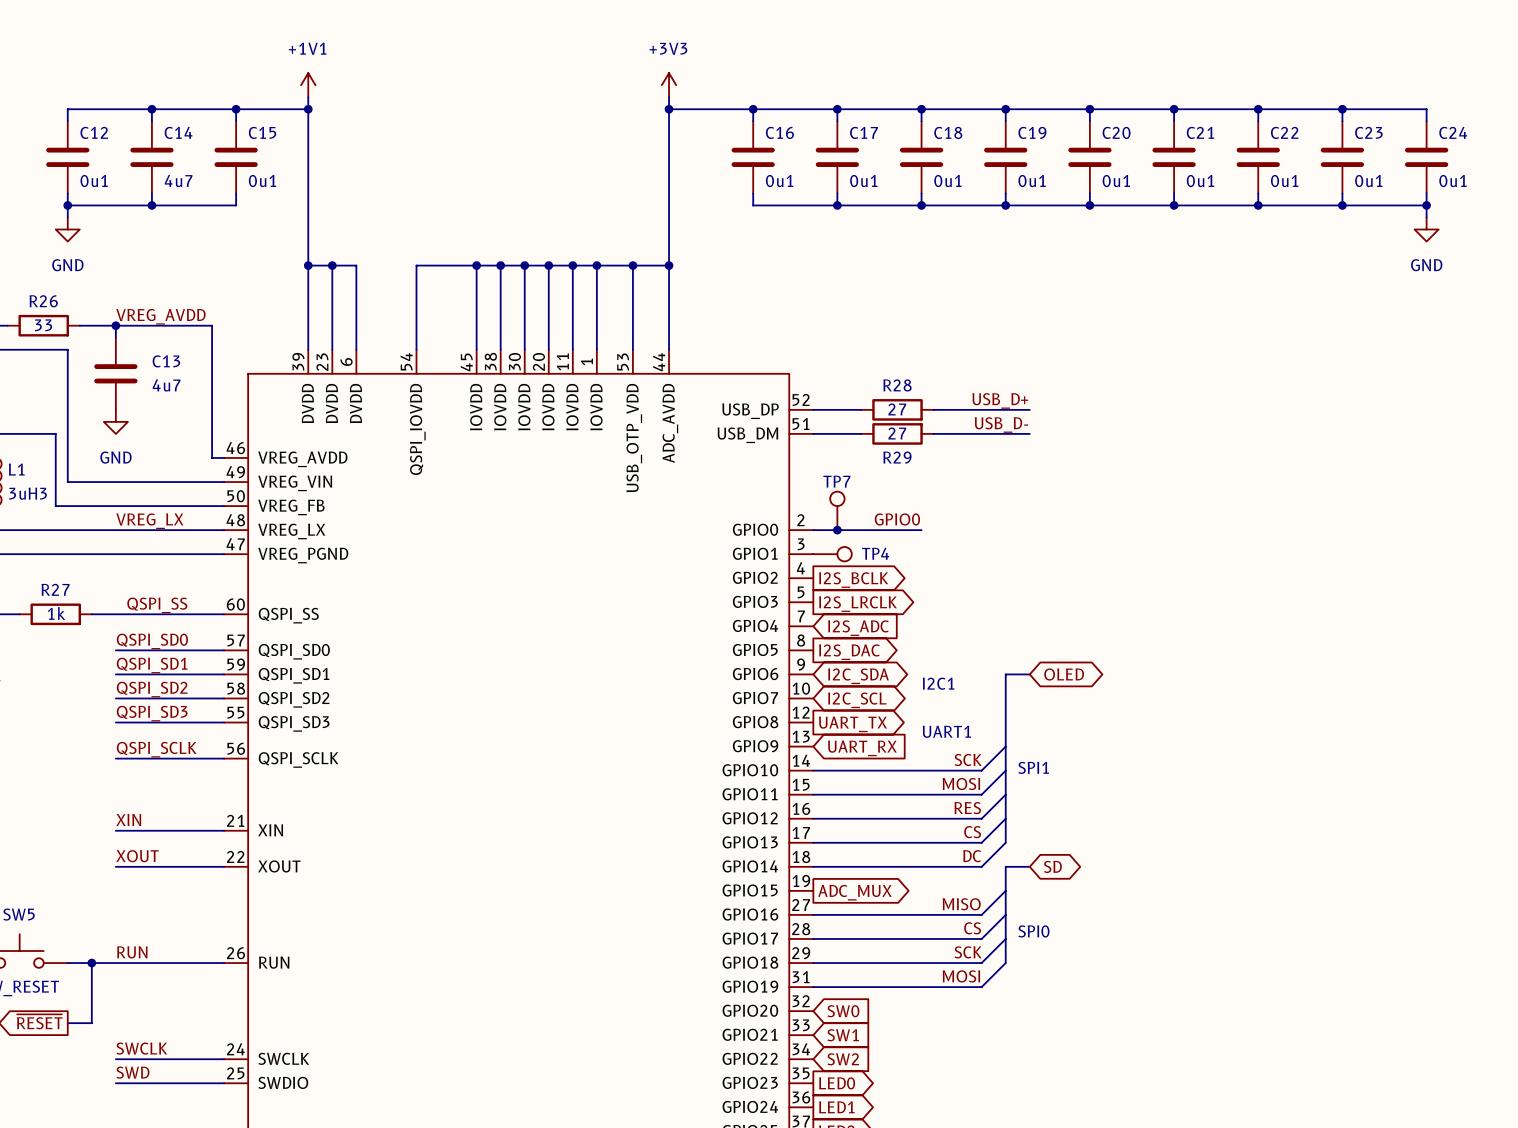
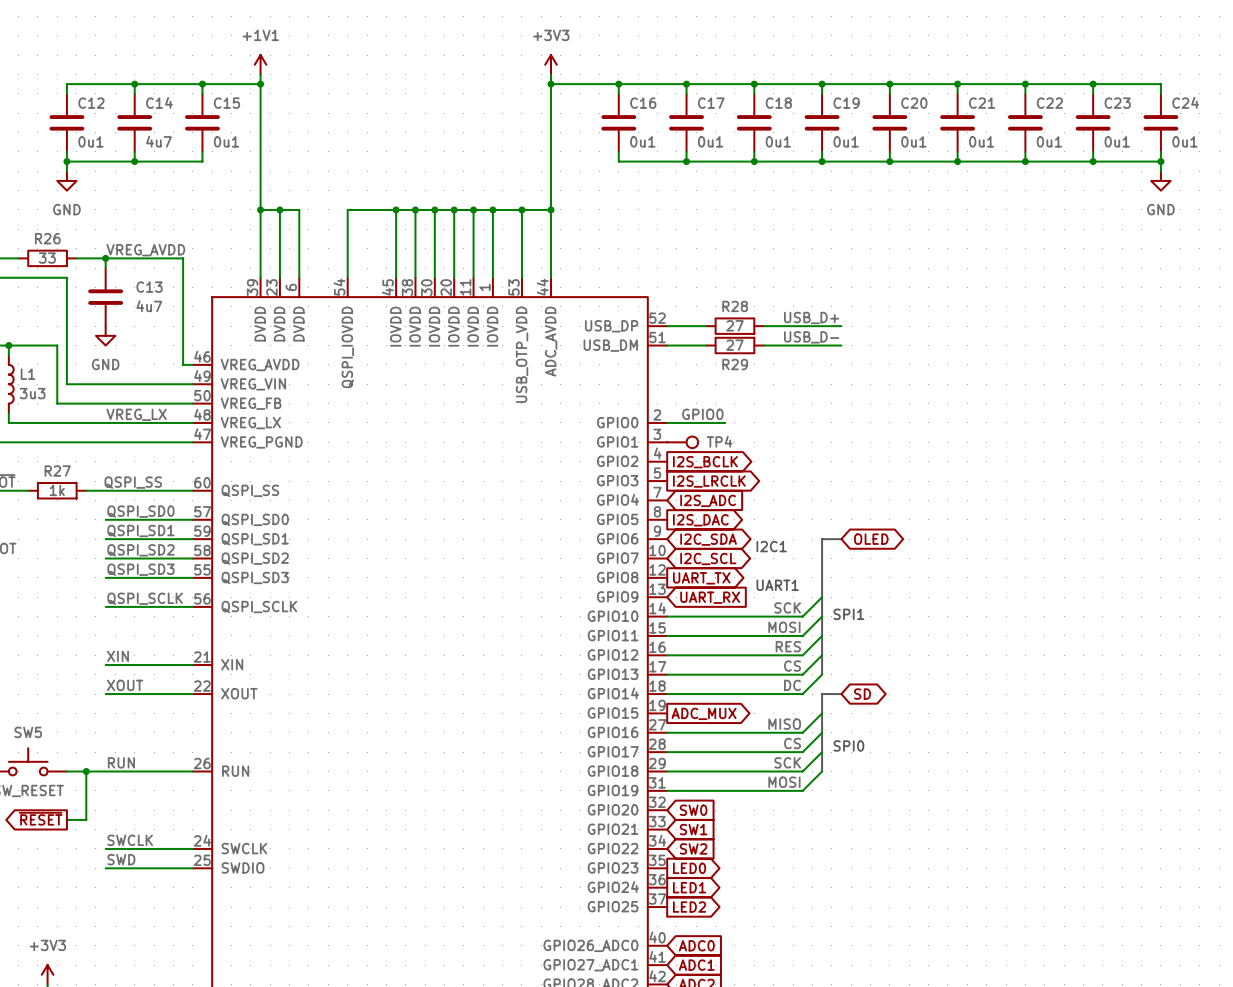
L1 value: 3uH3 (28, 493) -> 3u3 (32, 393)
TP7: (837, 510) -> none
label position: GPIO0 (897, 519) -> GPIO0 (702, 414)
junction: (837, 530) -> none
wire: (885, 530) (921, 530) -> none

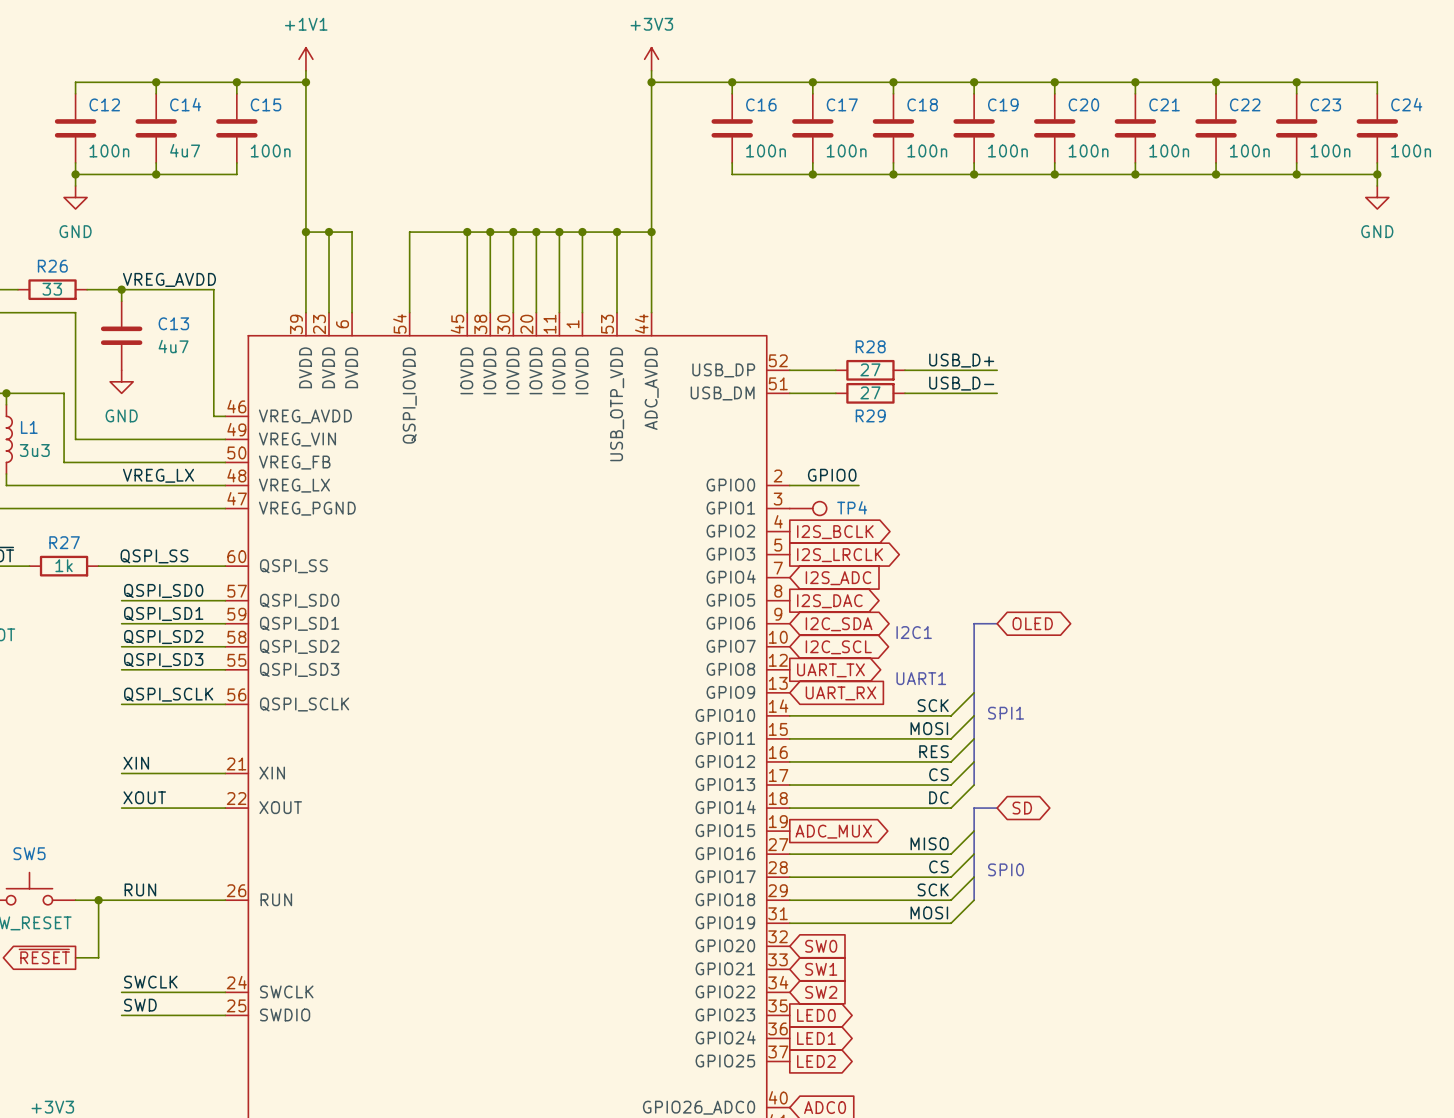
C12 value: 0u1 (90, 141) -> 100n (109, 150)
C15 value: 0u1 (226, 141) -> 100n (270, 150)
C16 value: 0u1 (642, 141) -> 100n (766, 150)
C17 value: 0u1 (710, 141) -> 100n (846, 150)
C18 value: 0u1 (778, 141) -> 100n (927, 150)
C19 value: 0u1 (846, 141) -> 100n (1007, 150)
C20 value: 0u1 (913, 141) -> 100n (1088, 150)
C21 value: 0u1 (981, 141) -> 100n (1169, 150)
C22 value: 0u1 (1049, 141) -> 100n (1249, 150)
C23 value: 0u1 (1117, 141) -> 100n (1330, 150)
C24 value: 0u1 (1184, 141) -> 100n (1411, 150)

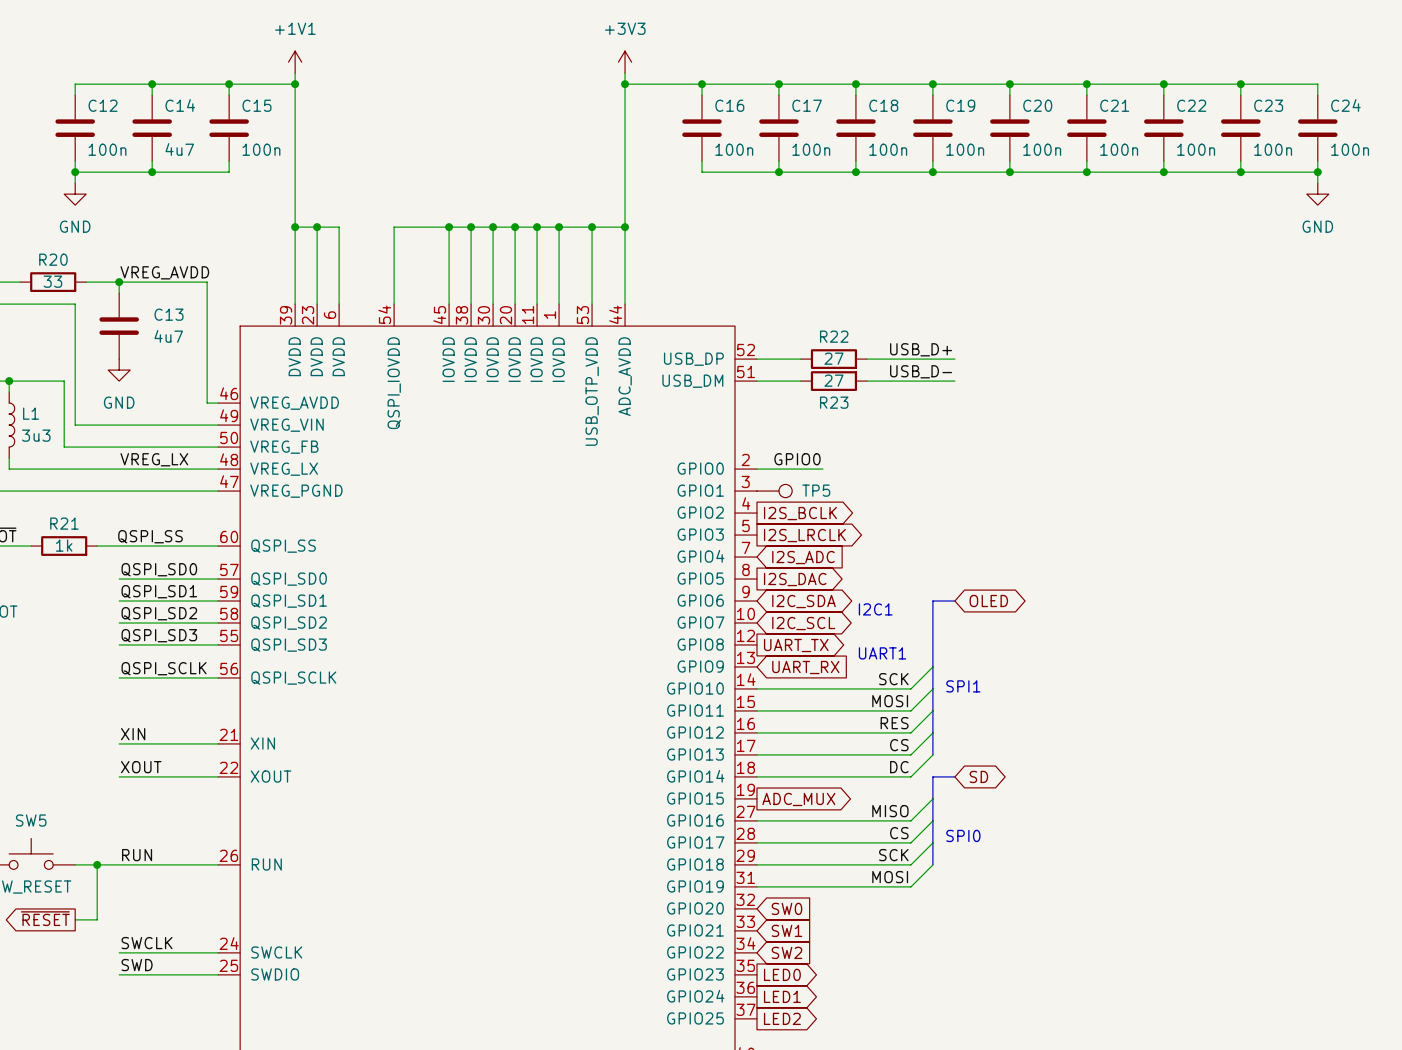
R26 name: R26 (52, 266) -> R20 (53, 259)
R28 name: R28 (870, 346) -> R22 (834, 336)
R29 name: R29 (870, 415) -> R23 (834, 402)
TP4 name: TP4 (852, 507) -> TP5 (816, 490)
R27 name: R27 (64, 542) -> R21 (64, 523)

